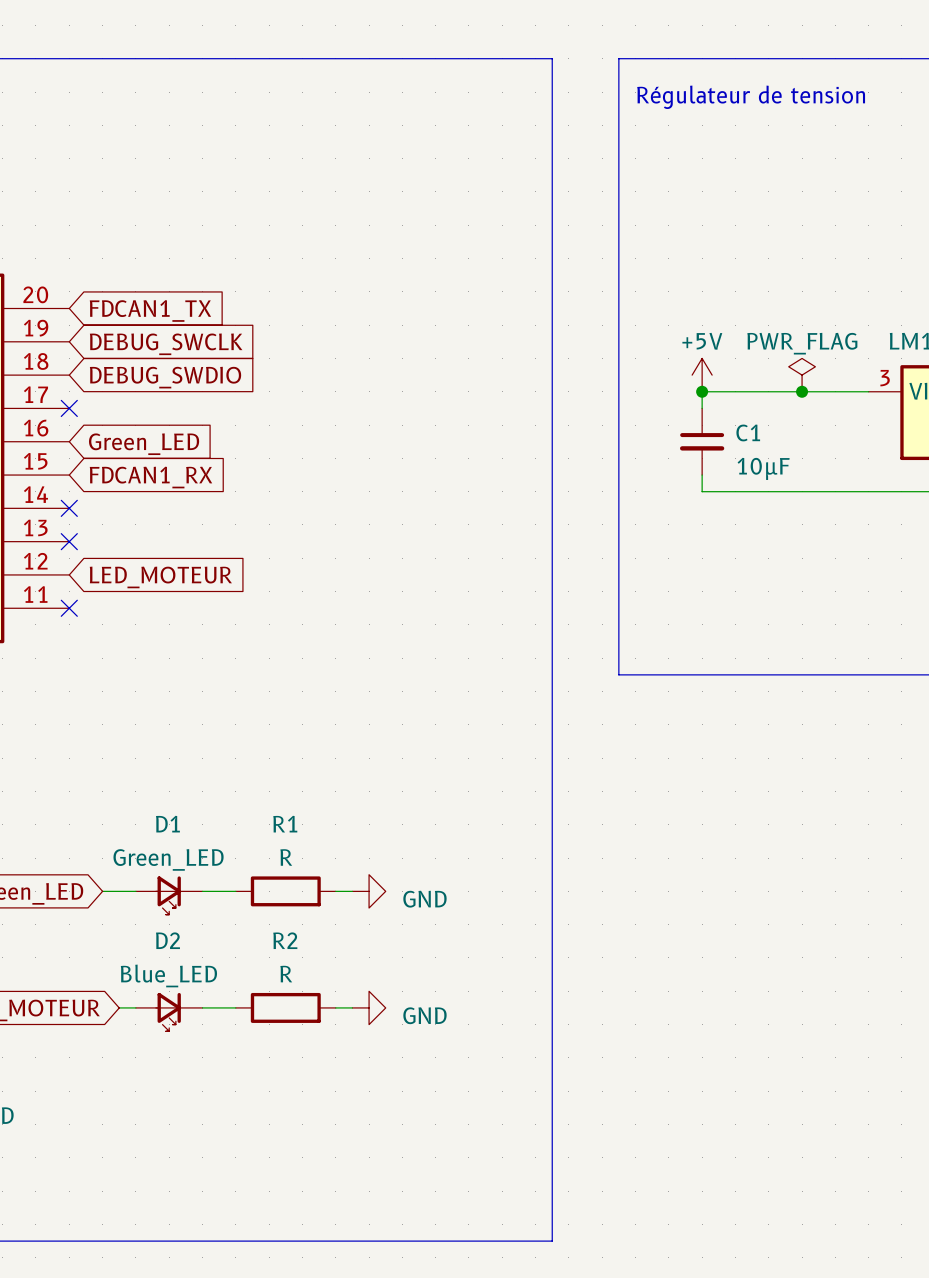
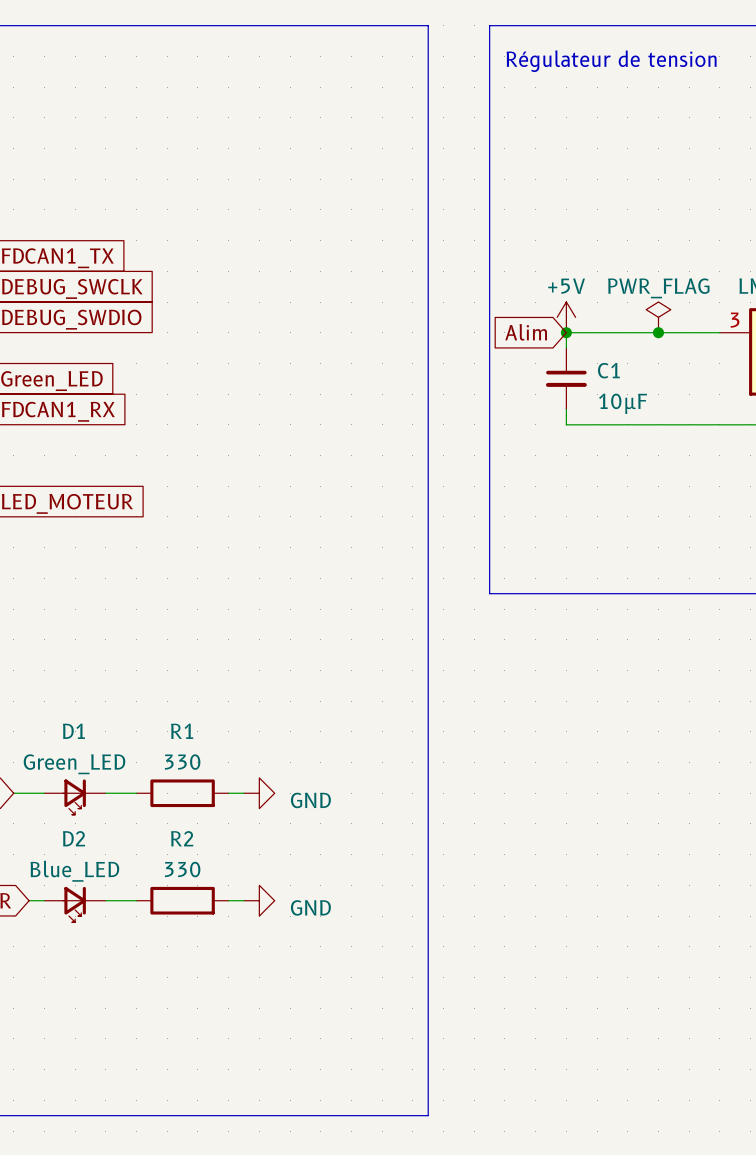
global label: none -> Alim (526, 332)
R1 value: R (286, 857) -> 330 (182, 762)
R2 value: R (286, 974) -> 330 (182, 869)

